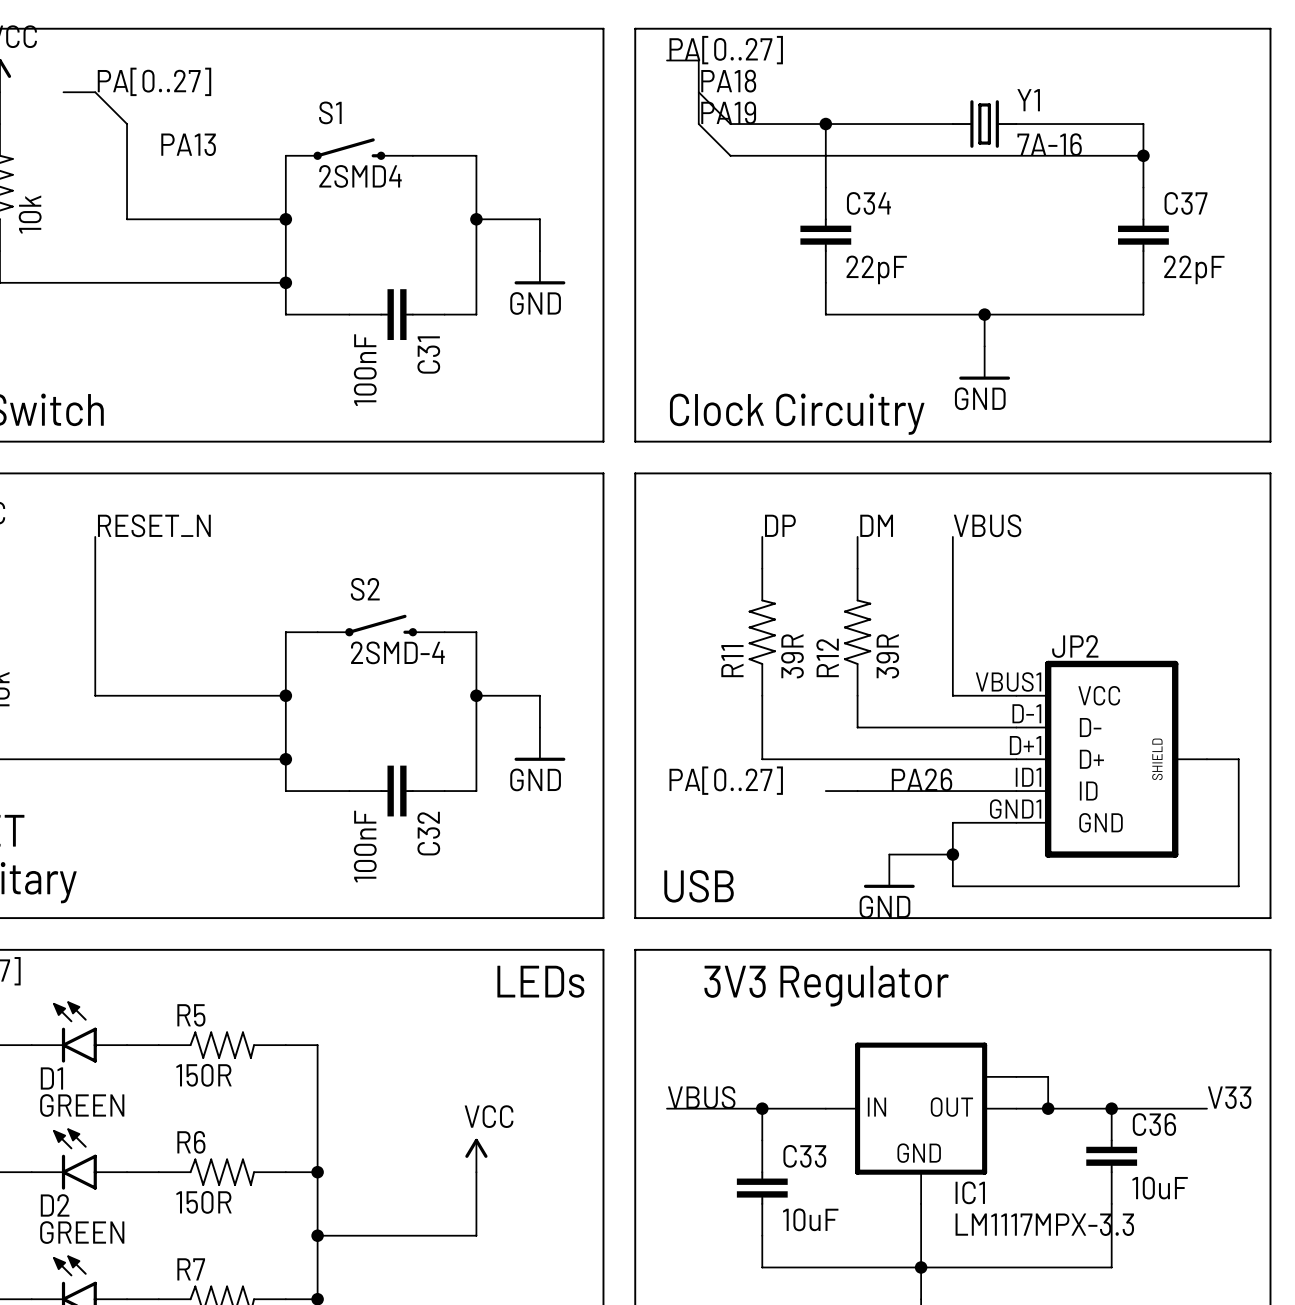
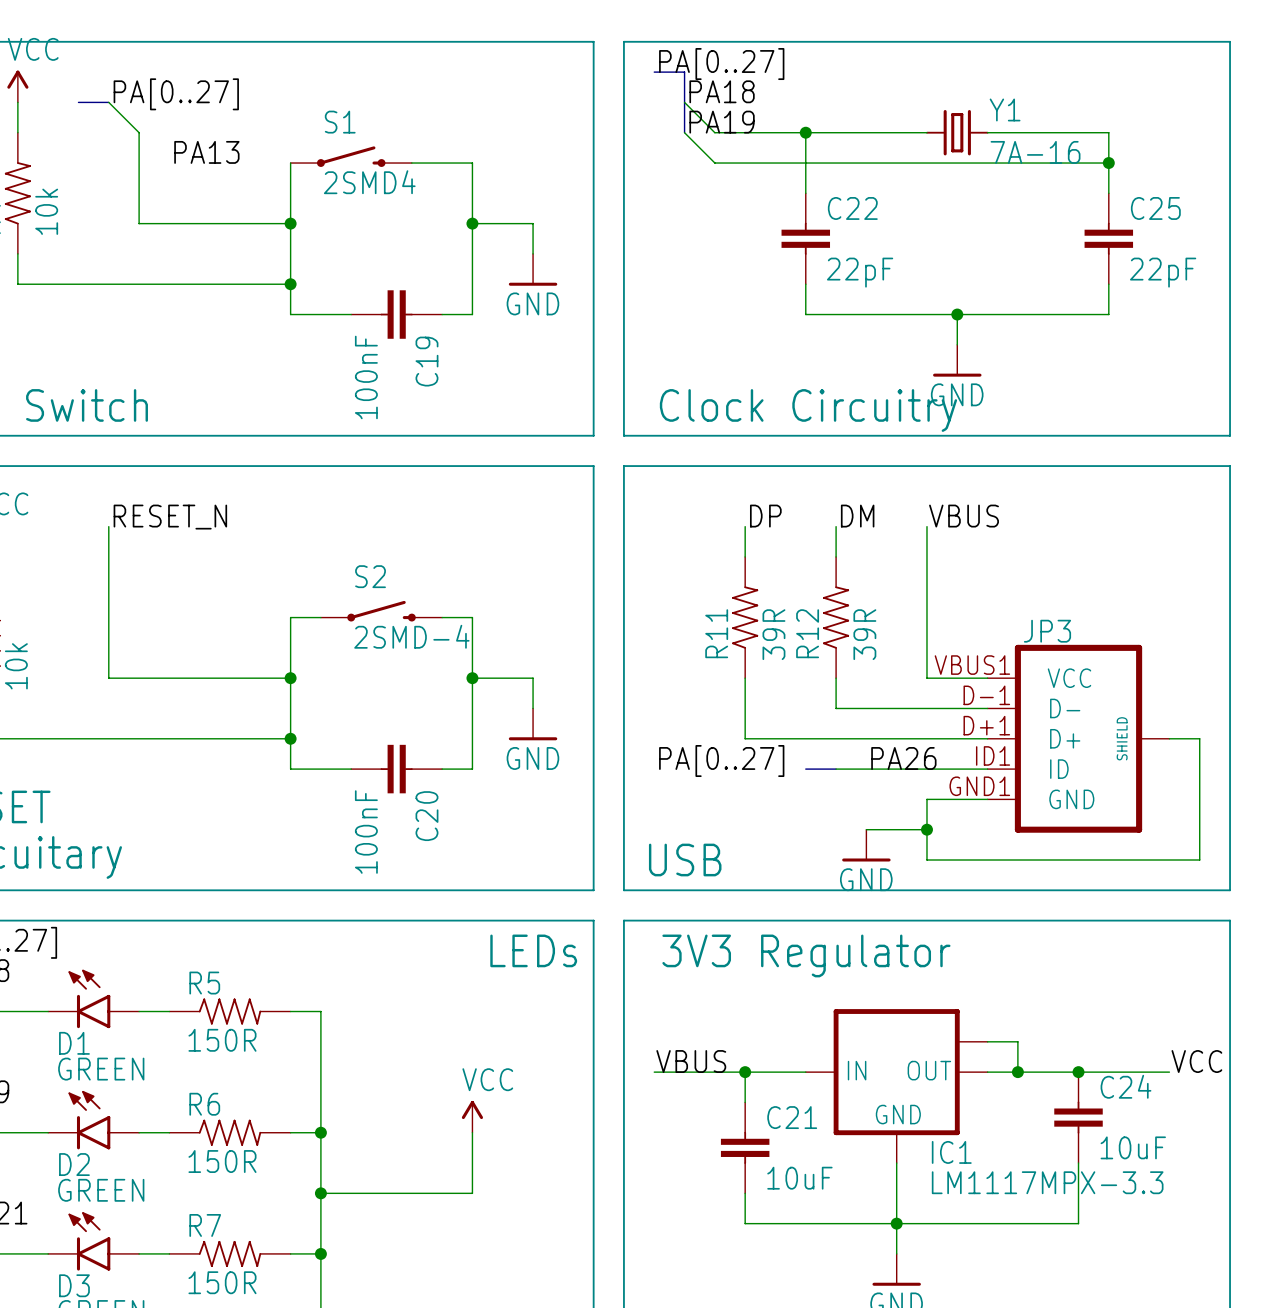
C34 name: C34 (868, 203) -> C22 (852, 208)
C37 name: C37 (1186, 203) -> C25 (1155, 208)
C31 name: C31 (428, 354) -> C19 (426, 361)
JP2 name: JP2 (1075, 646) -> JP3 (1047, 631)
C32 name: C32 (428, 833) -> C20 (426, 816)
label: V33 (1229, 1097) -> VCC (1196, 1061)
C36 name: C36 (1154, 1124) -> C24 (1125, 1086)
C33 name: C33 (804, 1156) -> C21 (792, 1117)

